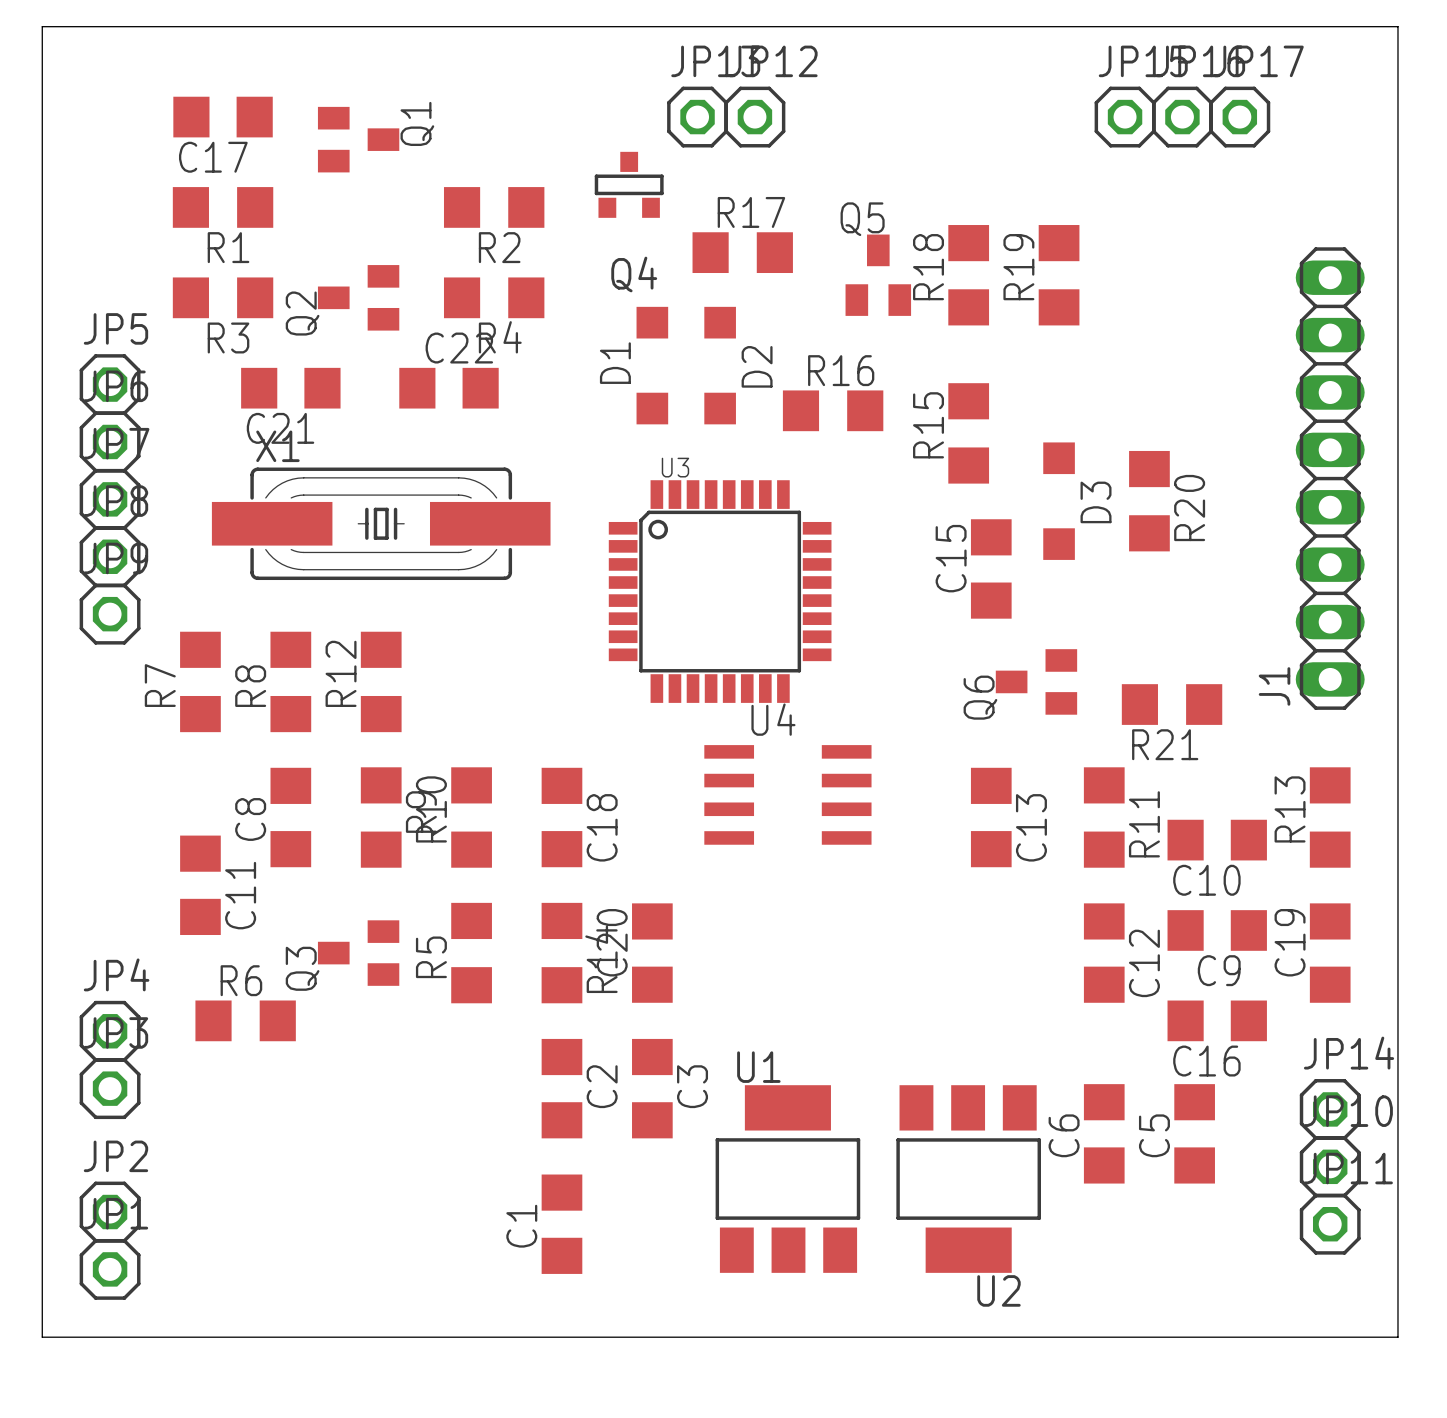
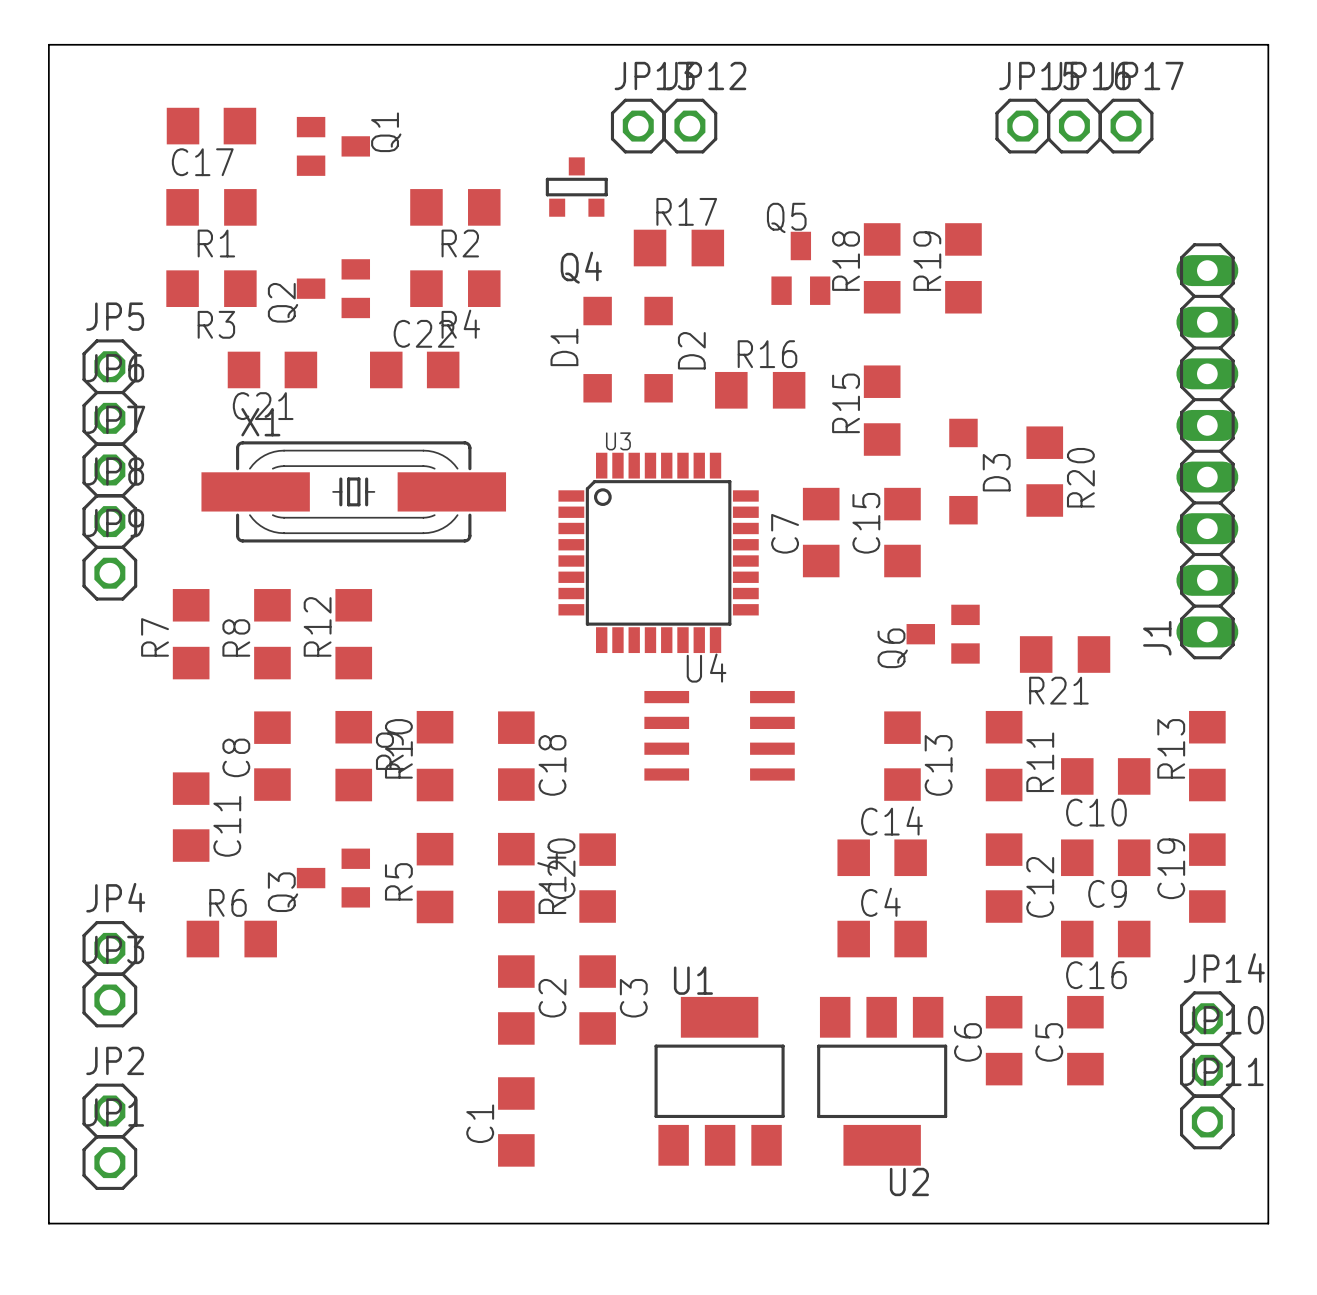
C7: none -> (821, 532)
C14: none -> (882, 857)
C4: none -> (882, 939)

